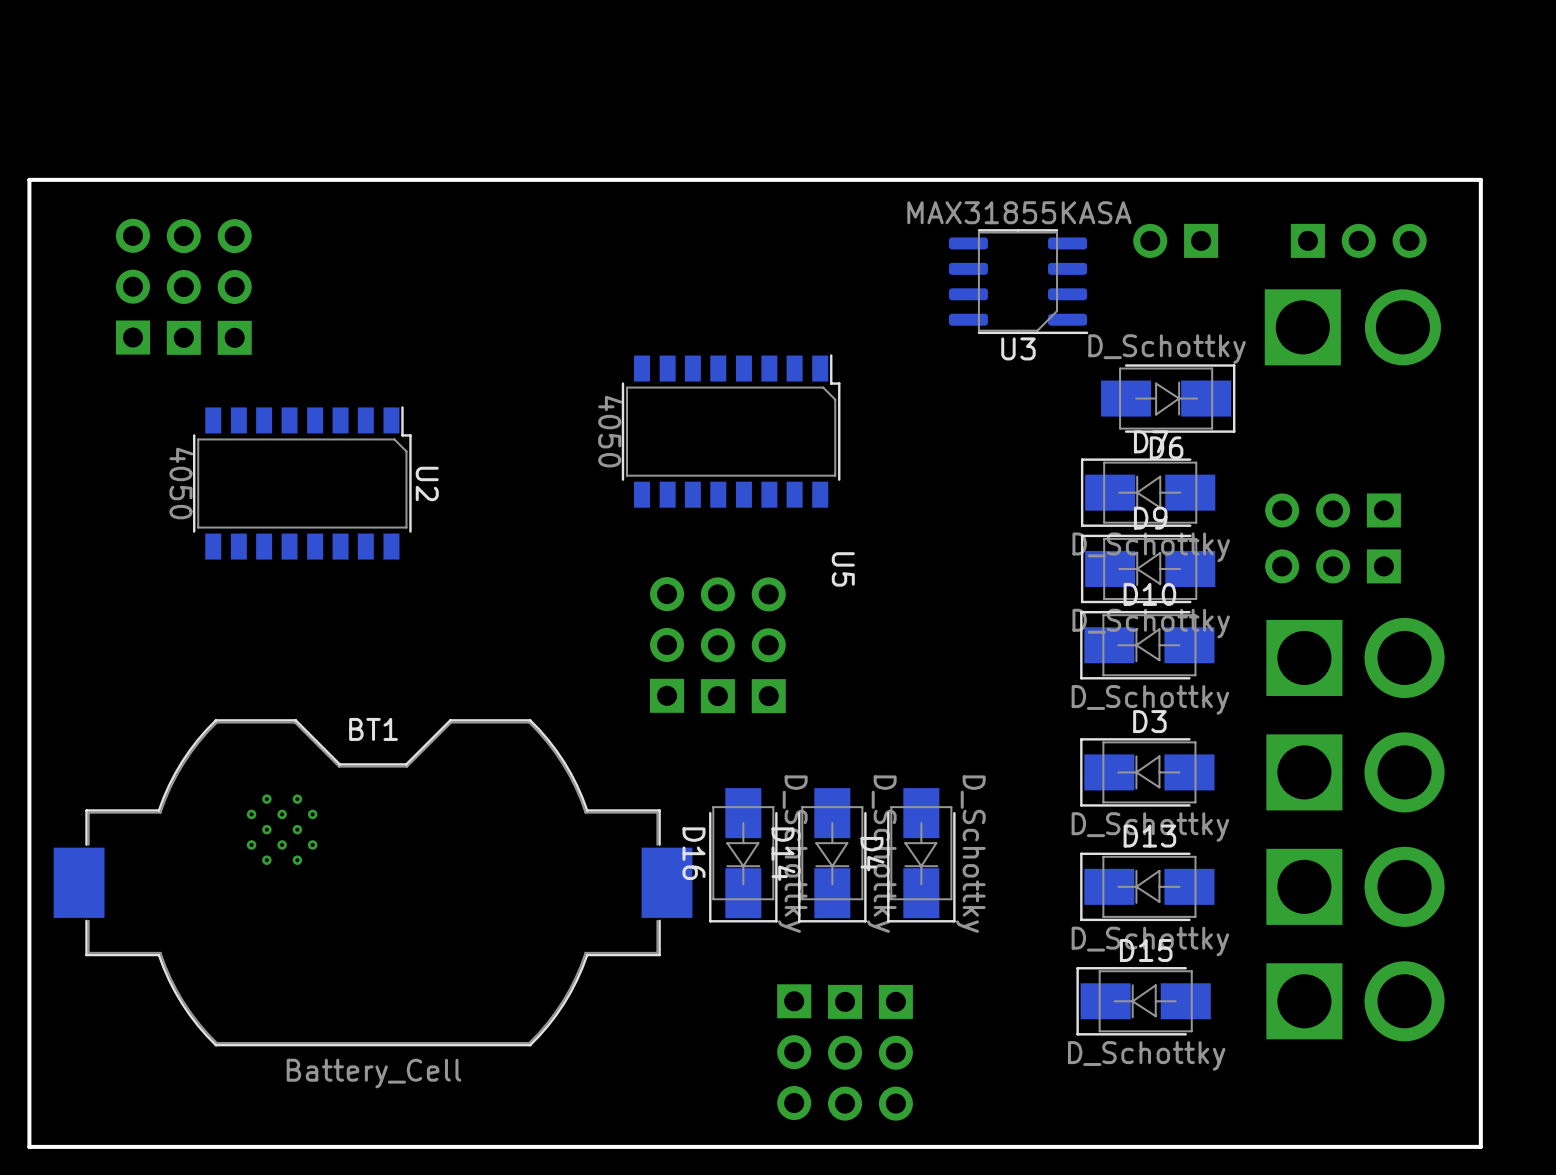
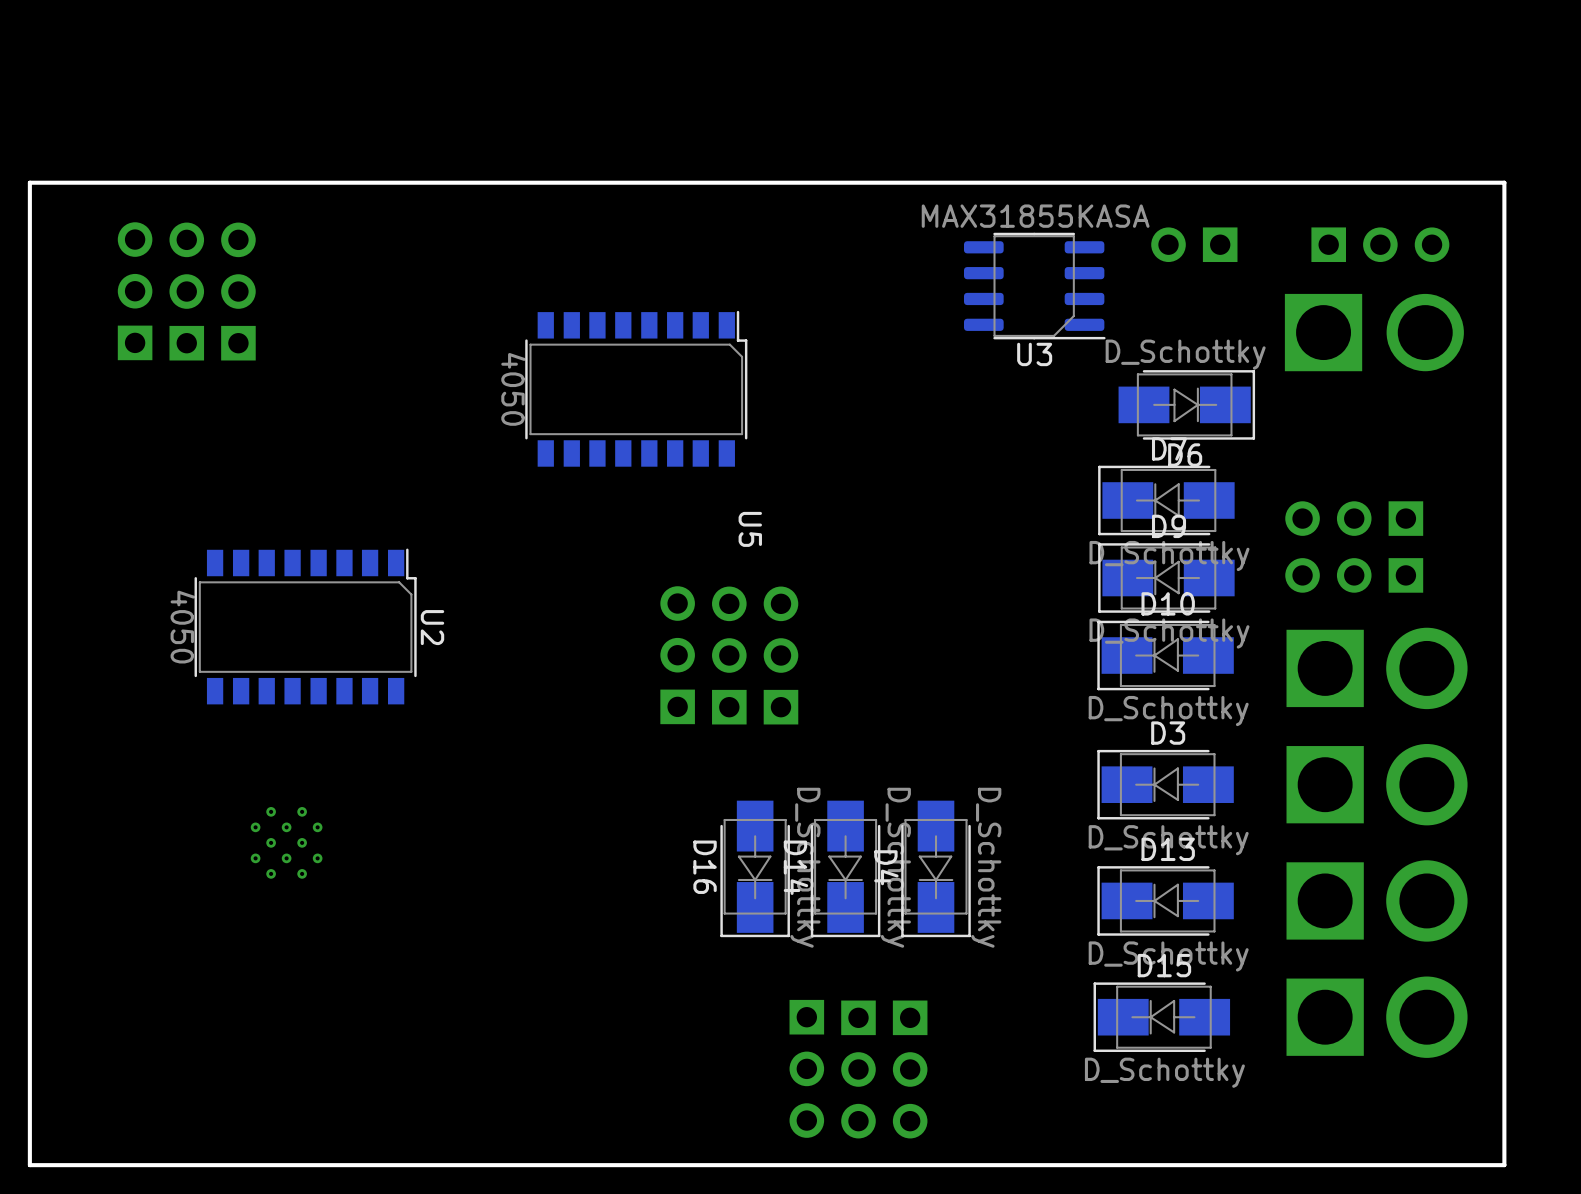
U5 position: (731, 431) -> (636, 388)
U2 position: (302, 482) -> (305, 626)
BT1: Battery_Cell (373, 882) -> none

